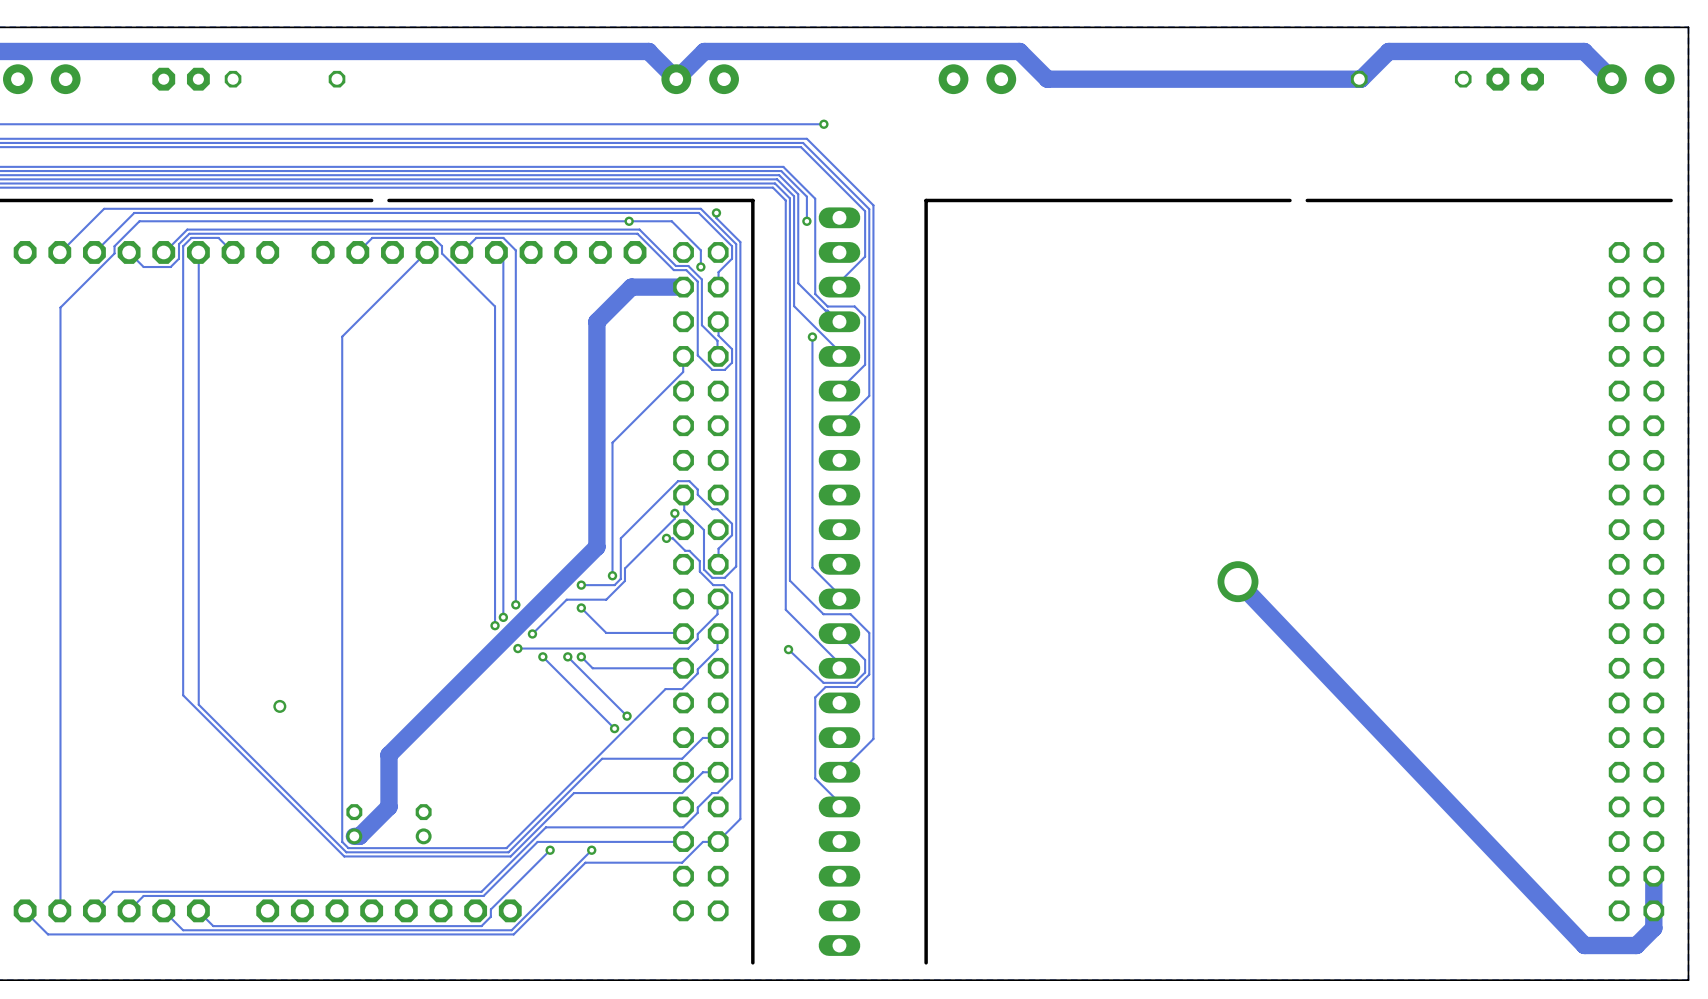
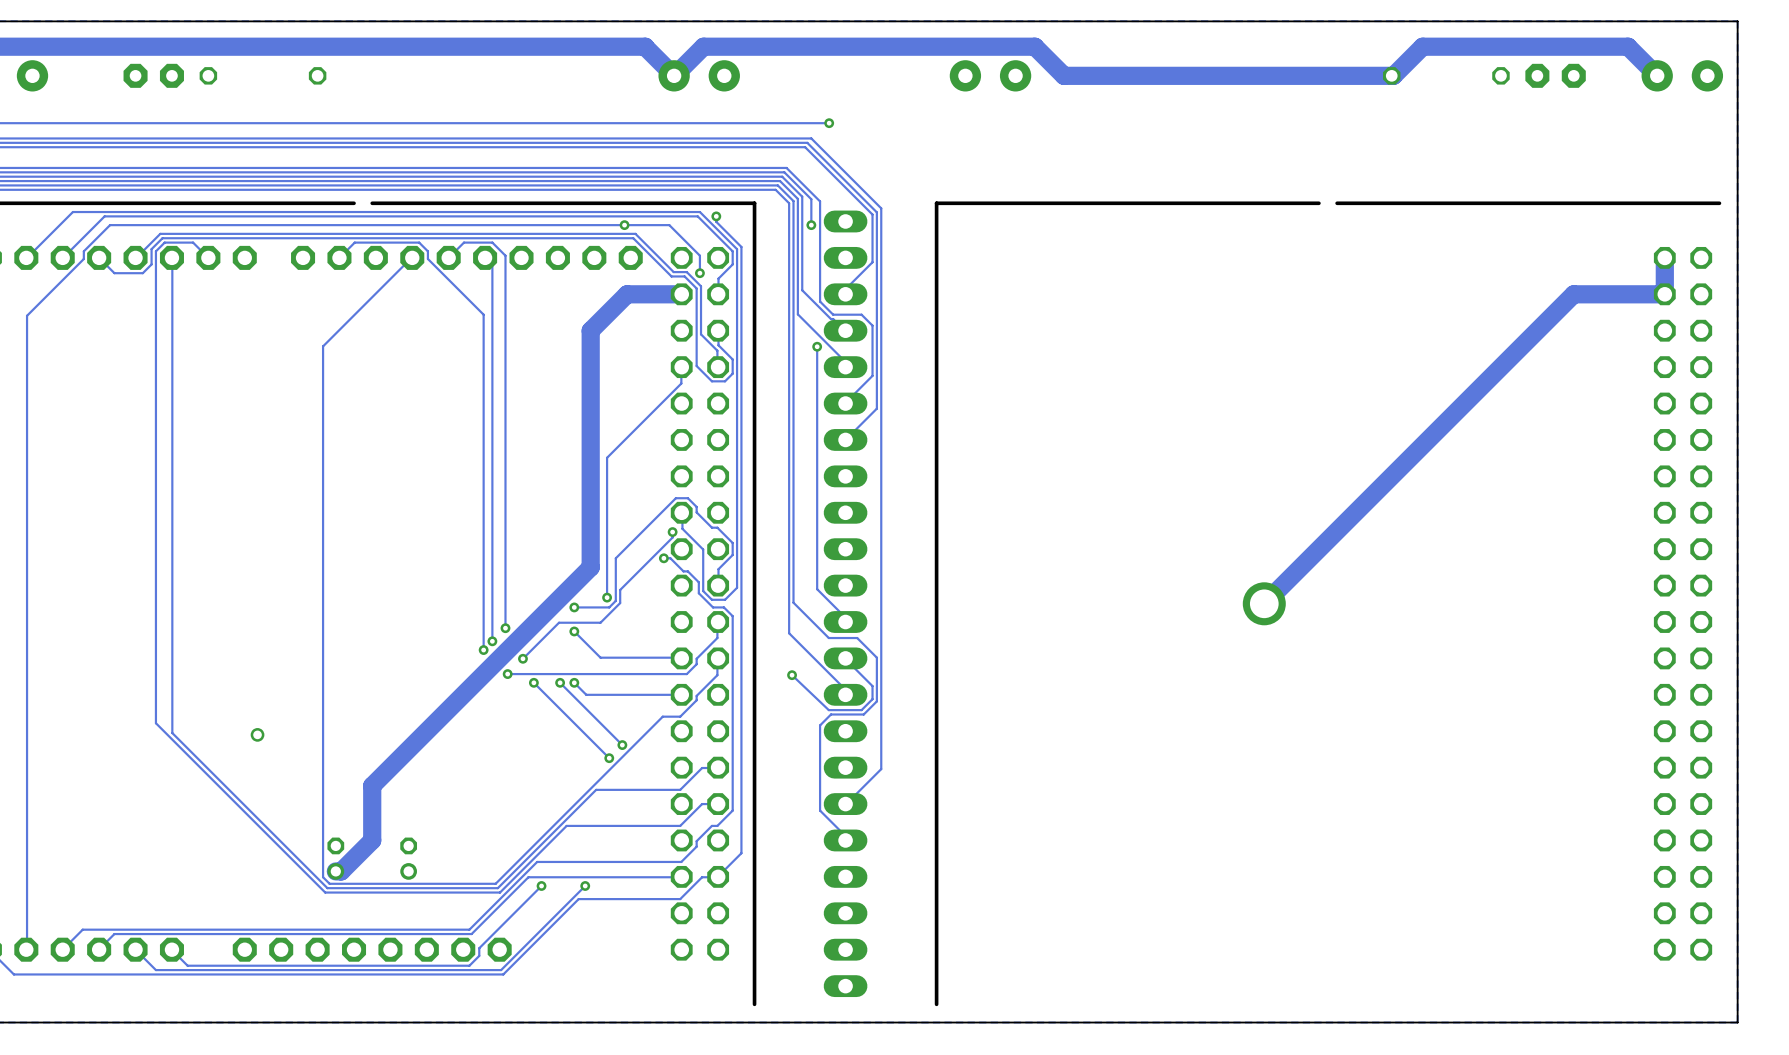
track: (1237, 581) (1584, 945) (1636, 945) (1653, 928) (1653, 876) -> (1264, 603) (1573, 294) (1664, 294) (1664, 257)

